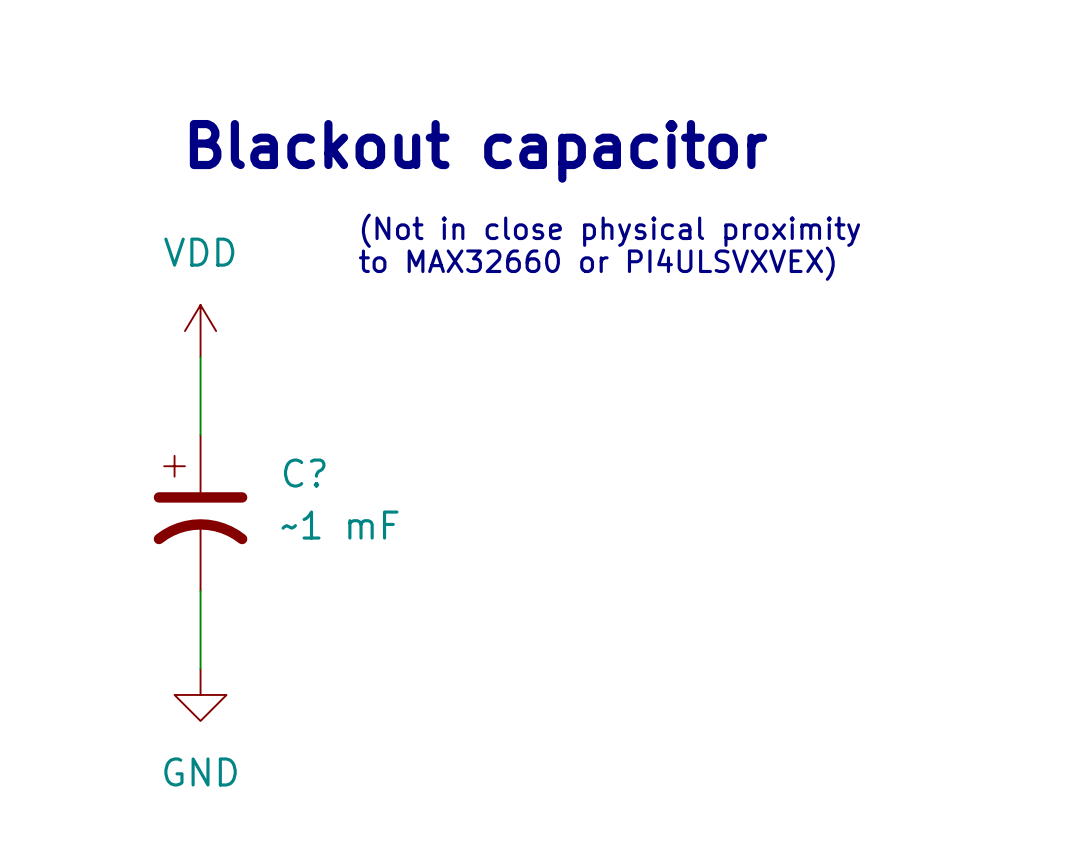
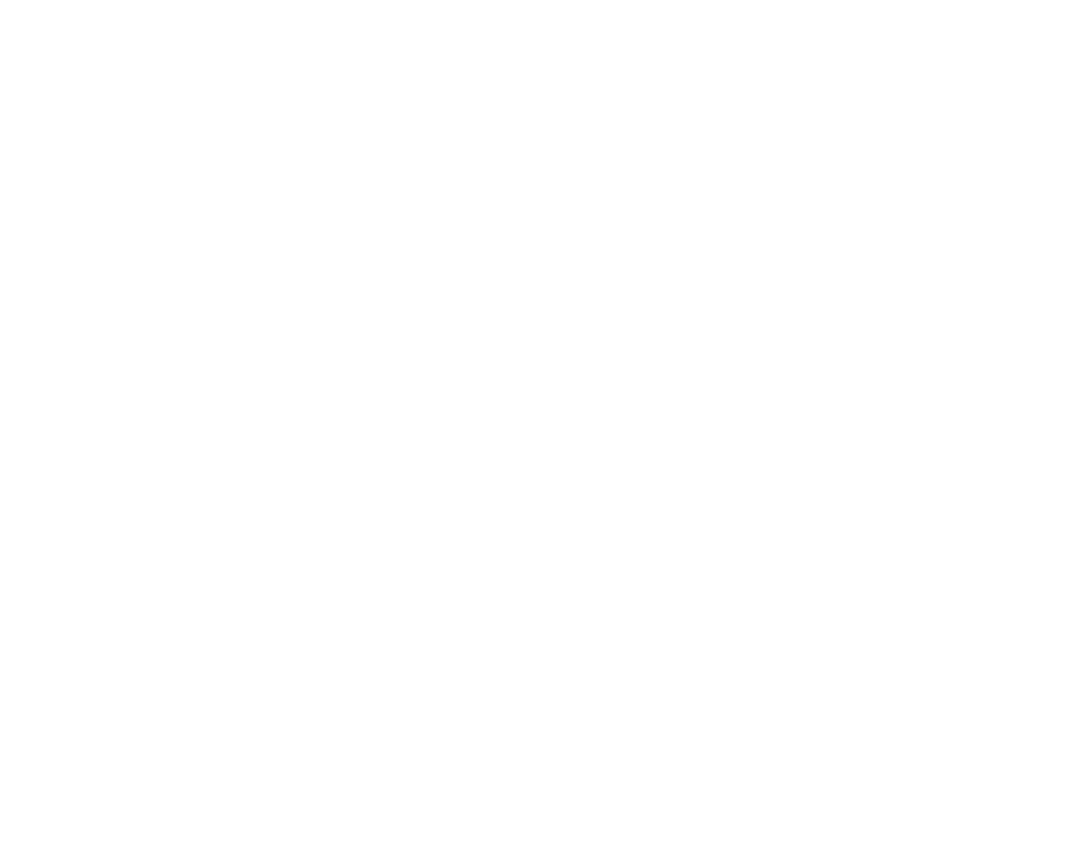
text: Blackout capacitor (478, 151) -> none
text: (Not in close physical proximity (610, 230) -> none
text: to MAX32660 or PI4ULSVXVEX) (596, 263) -> none
power symbol: VDD (200, 331) -> none
wire: (200, 357) (200, 435) -> none
C?: ~1 mF (200, 513) -> none
wire: (200, 591) (200, 668) -> none
power symbol: GND (200, 694) -> none

